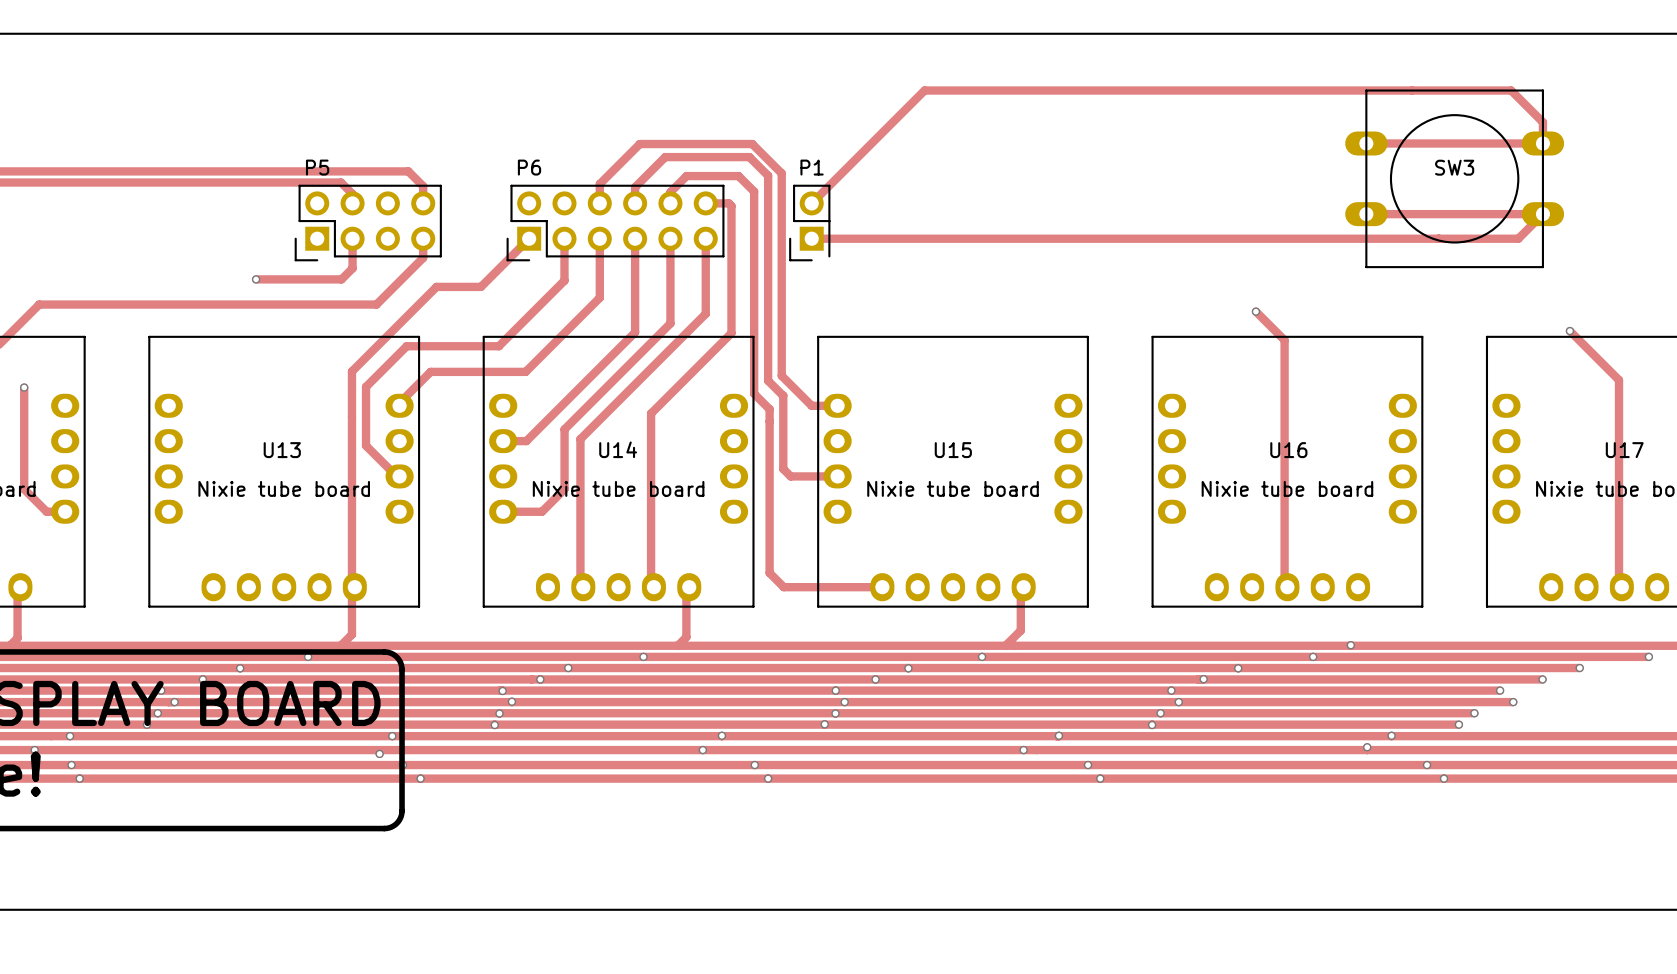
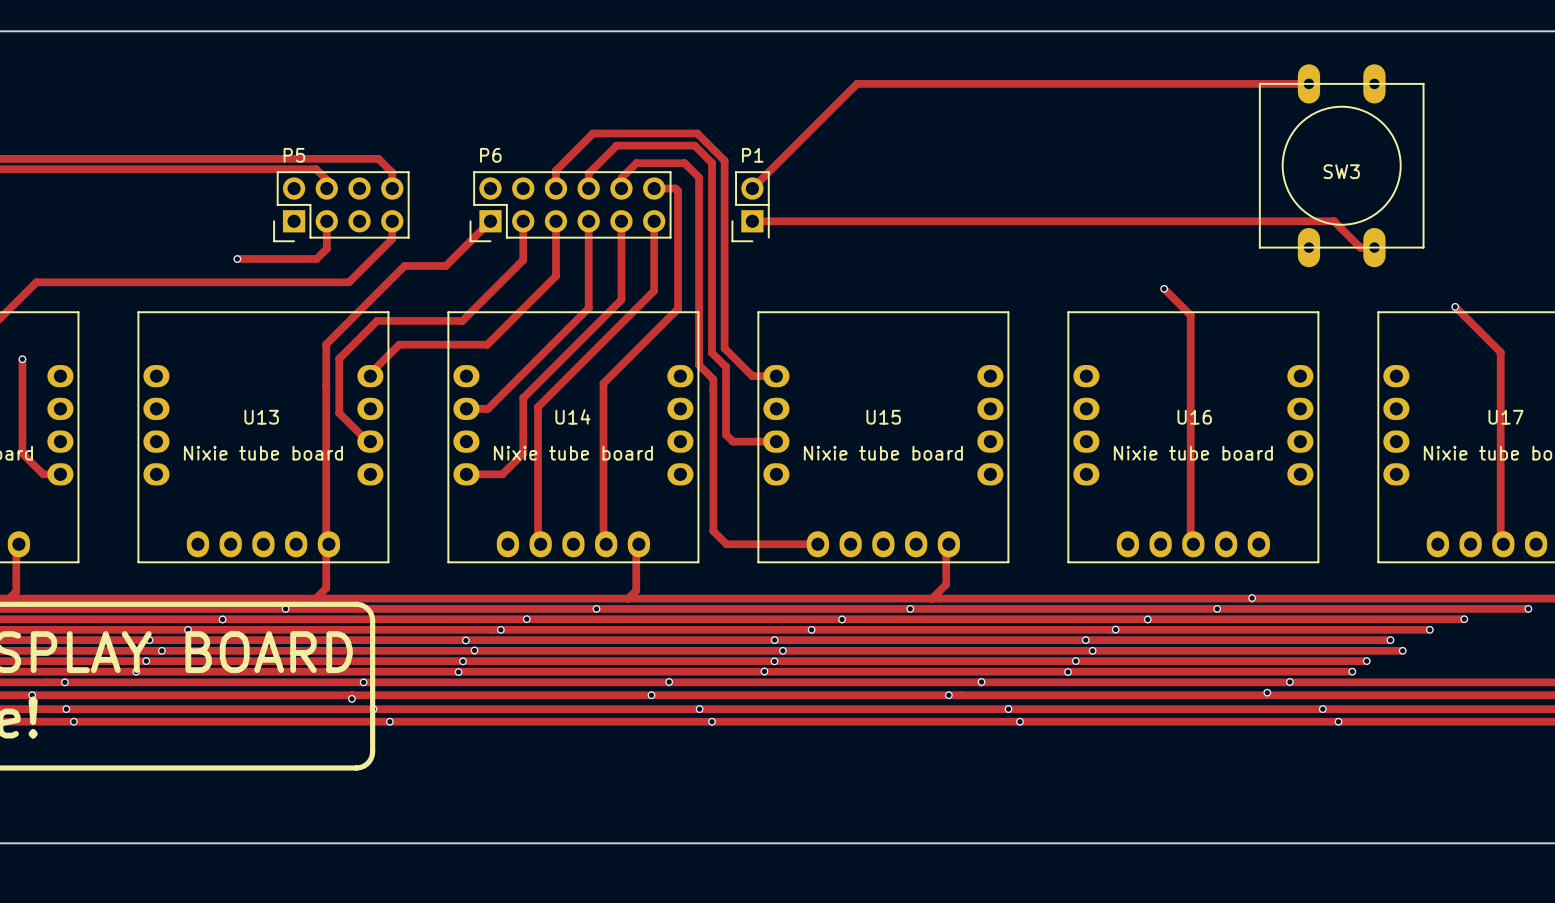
SW3 footprint: [1345, 89, 1565, 269] -> [1258, 64, 1425, 268]
track: (1412, 90) (1511, 90) (1542, 122) (1542, 143) (1366, 143) -> none
track: (1366, 214) (1542, 214) (1518, 238) (1439, 238) -> (1374, 247) (1360, 247) (1334, 221)

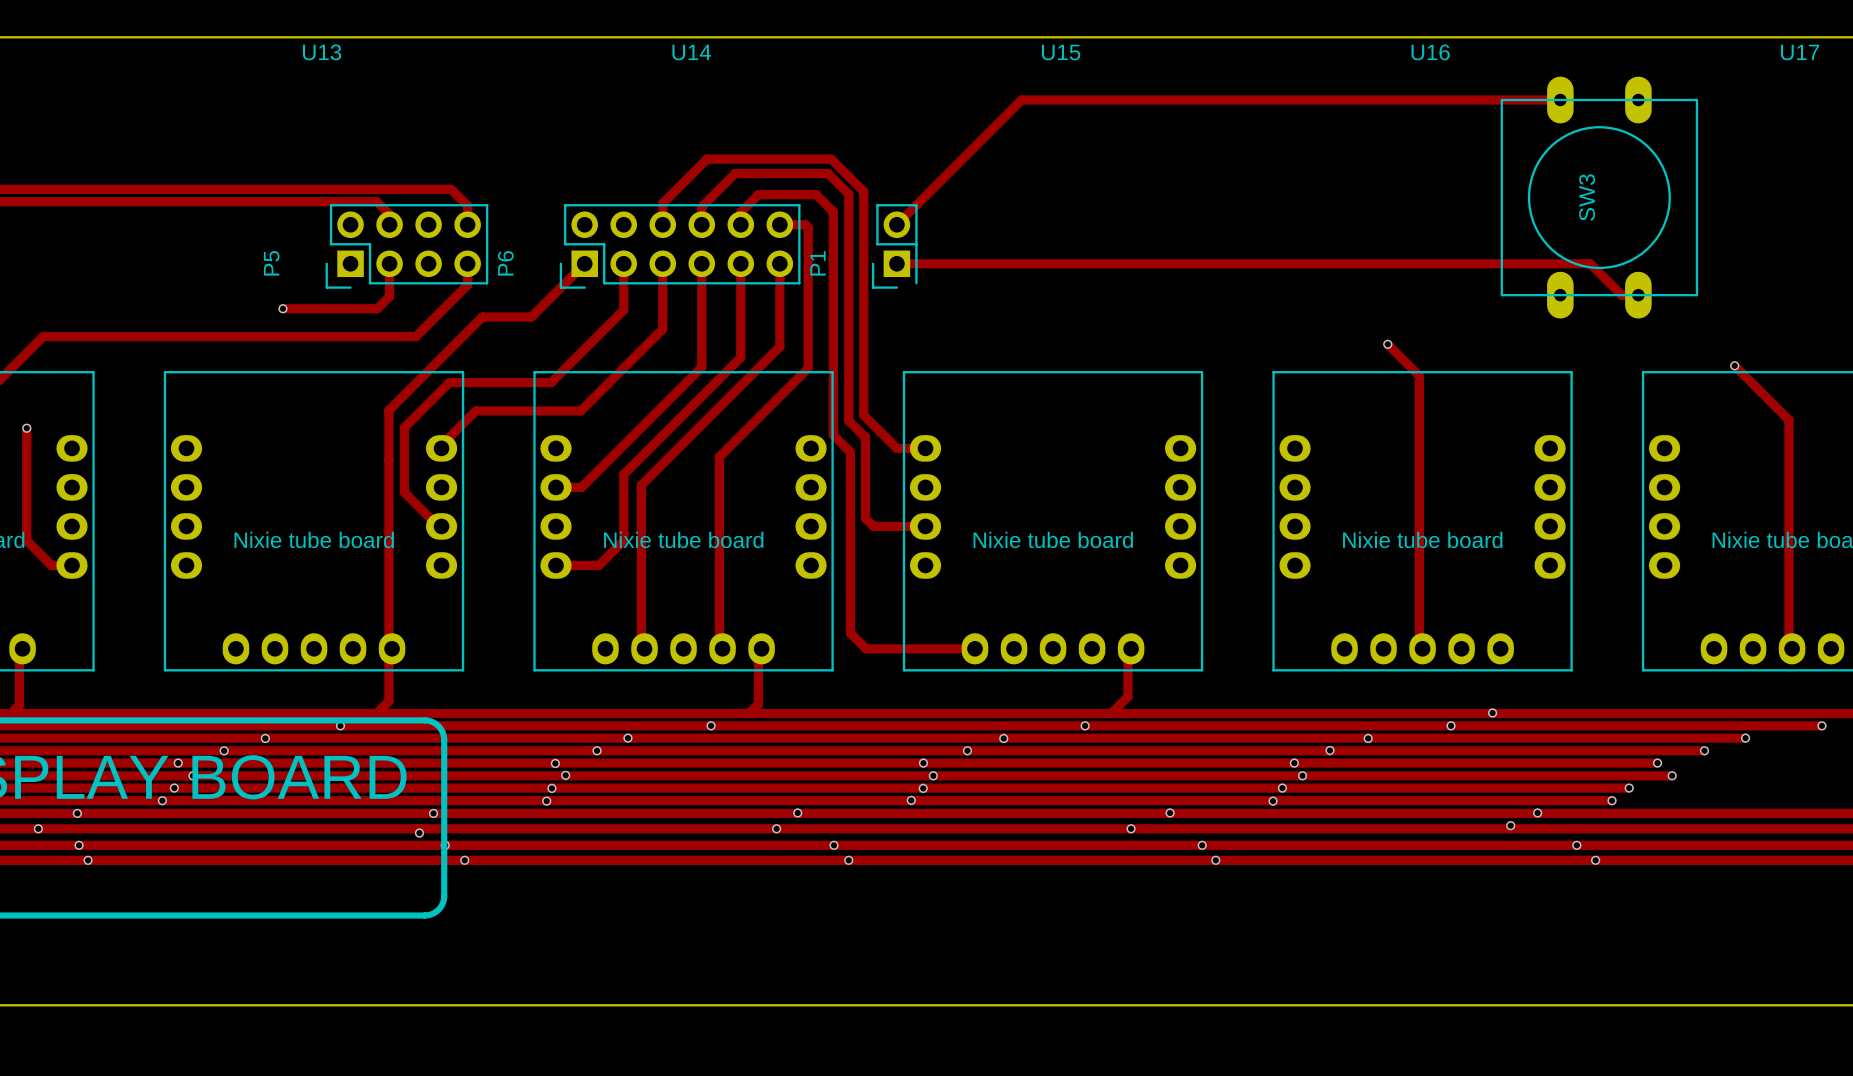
P5 name rotation: 0° (294, 155) -> 90° counterclockwise (271, 263)
P5 name position: P5 (294, 155) -> P5 (271, 263)
P6 name rotation: 0° (490, 155) -> 90° counterclockwise (505, 263)
P6 name position: P6 (490, 155) -> P6 (505, 263)
P1 name rotation: 0° (752, 155) -> 90° counterclockwise (817, 263)
P1 name position: P1 (752, 155) -> P1 (817, 263)
SW3 name rotation: 0° (1341, 171) -> 90° counterclockwise (1587, 197)
U14 name position: U14 (572, 416) -> U14 (691, 52)
U13 name position: U13 (261, 417) -> U13 (322, 52)
U15 name position: U15 (883, 417) -> U15 (1061, 52)
U16 name position: U16 (1194, 417) -> U16 (1430, 52)
U17 name position: U17 (1505, 417) -> U17 (1800, 52)

